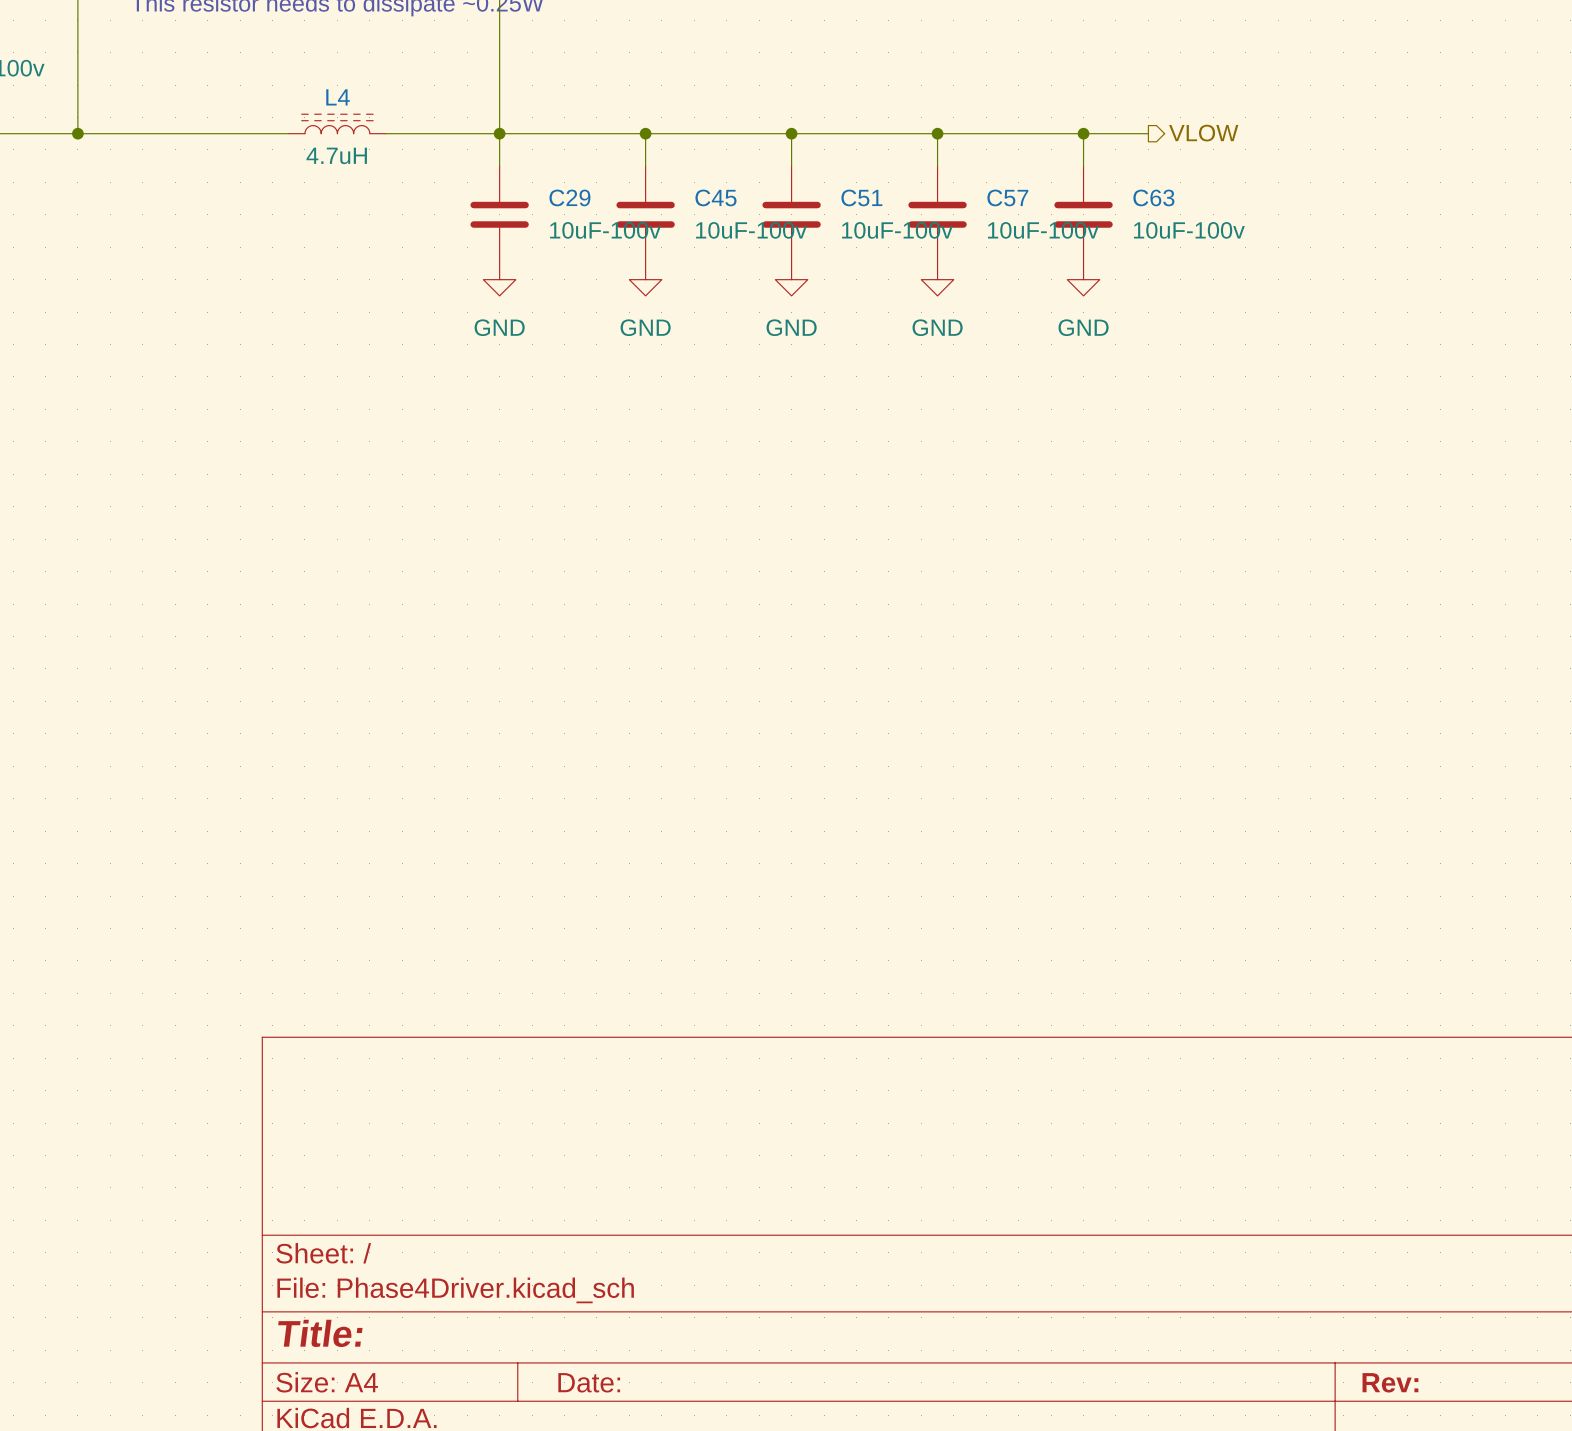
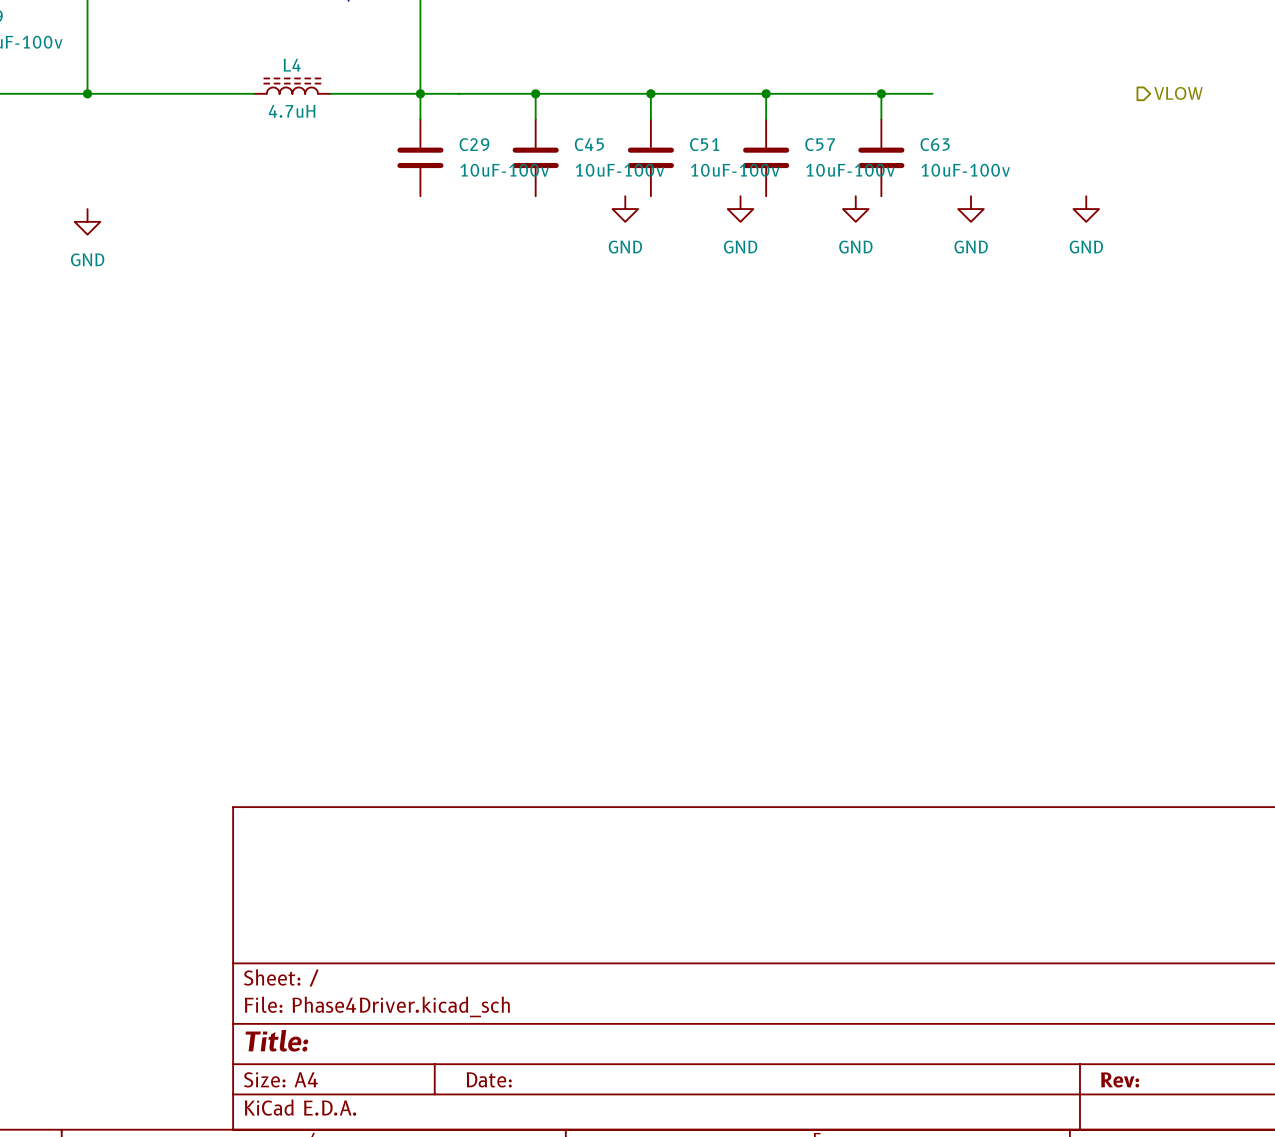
hierarchical label position: VLOW (1203, 133) -> VLOW (1178, 93)
power symbol: GND (499, 279) -> none
power symbol: GND (645, 279) -> none
power symbol position: GND (791, 279) -> GND (625, 209)
power symbol position: GND (937, 279) -> GND (740, 209)
power symbol position: GND (1083, 279) -> GND (855, 209)
power symbol: none -> GND (971, 209)
power symbol: none -> GND (1086, 209)
power symbol: none -> GND (87, 221)

